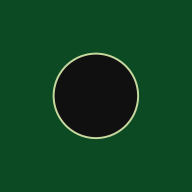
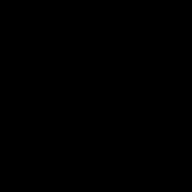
hole: (95, 95) -> none

